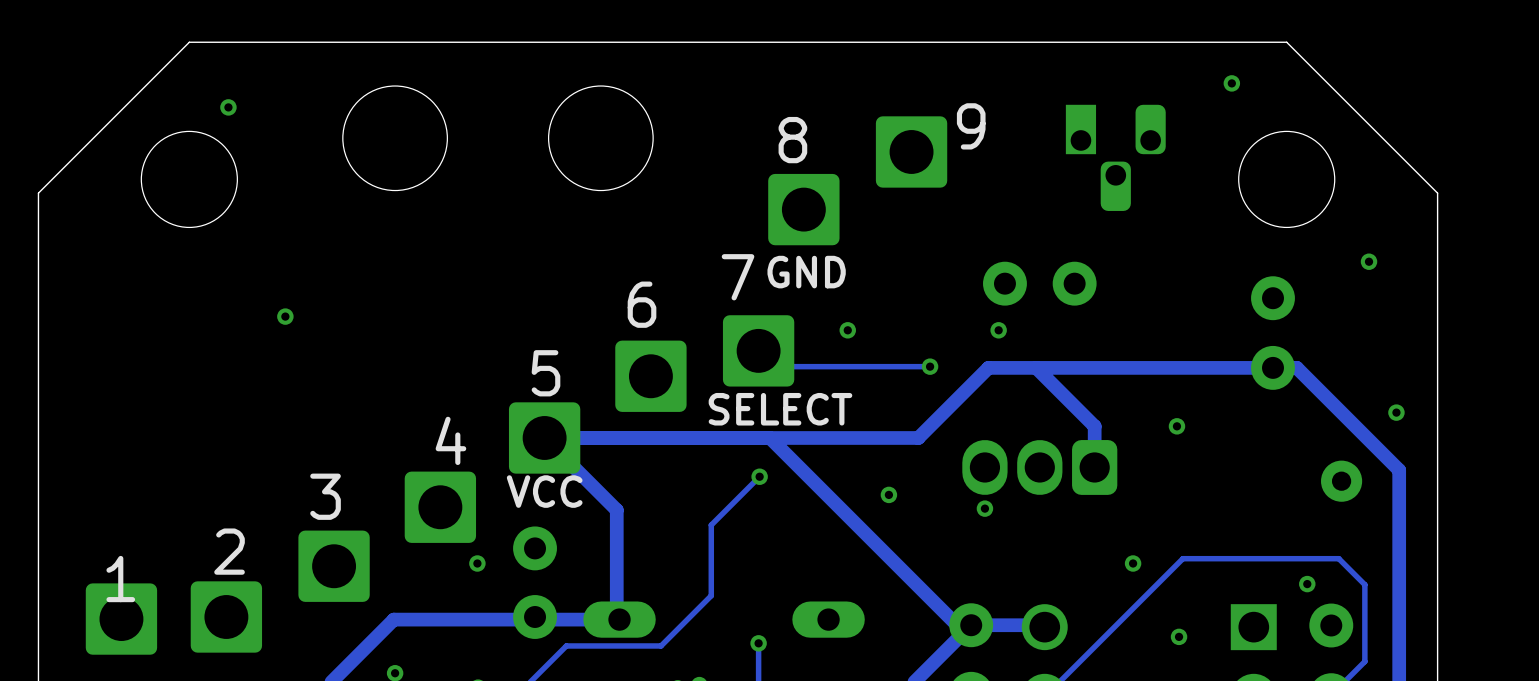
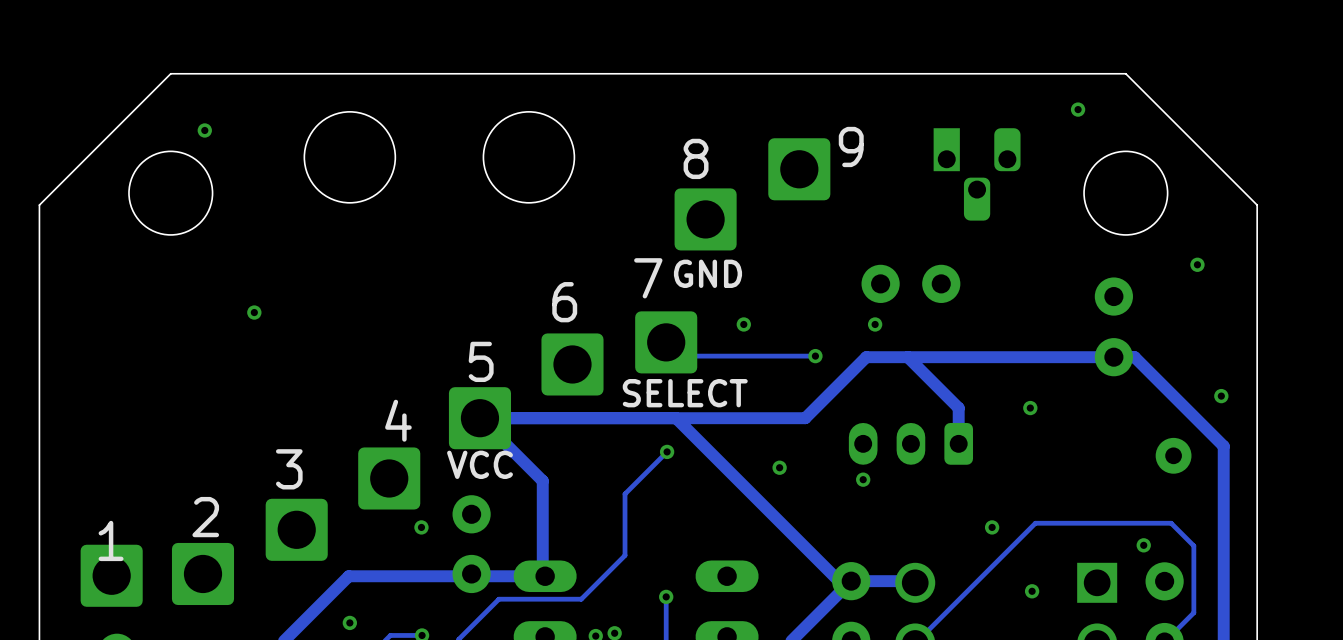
part footprint: [962, 440, 1118, 495] -> [848, 422, 974, 465]

